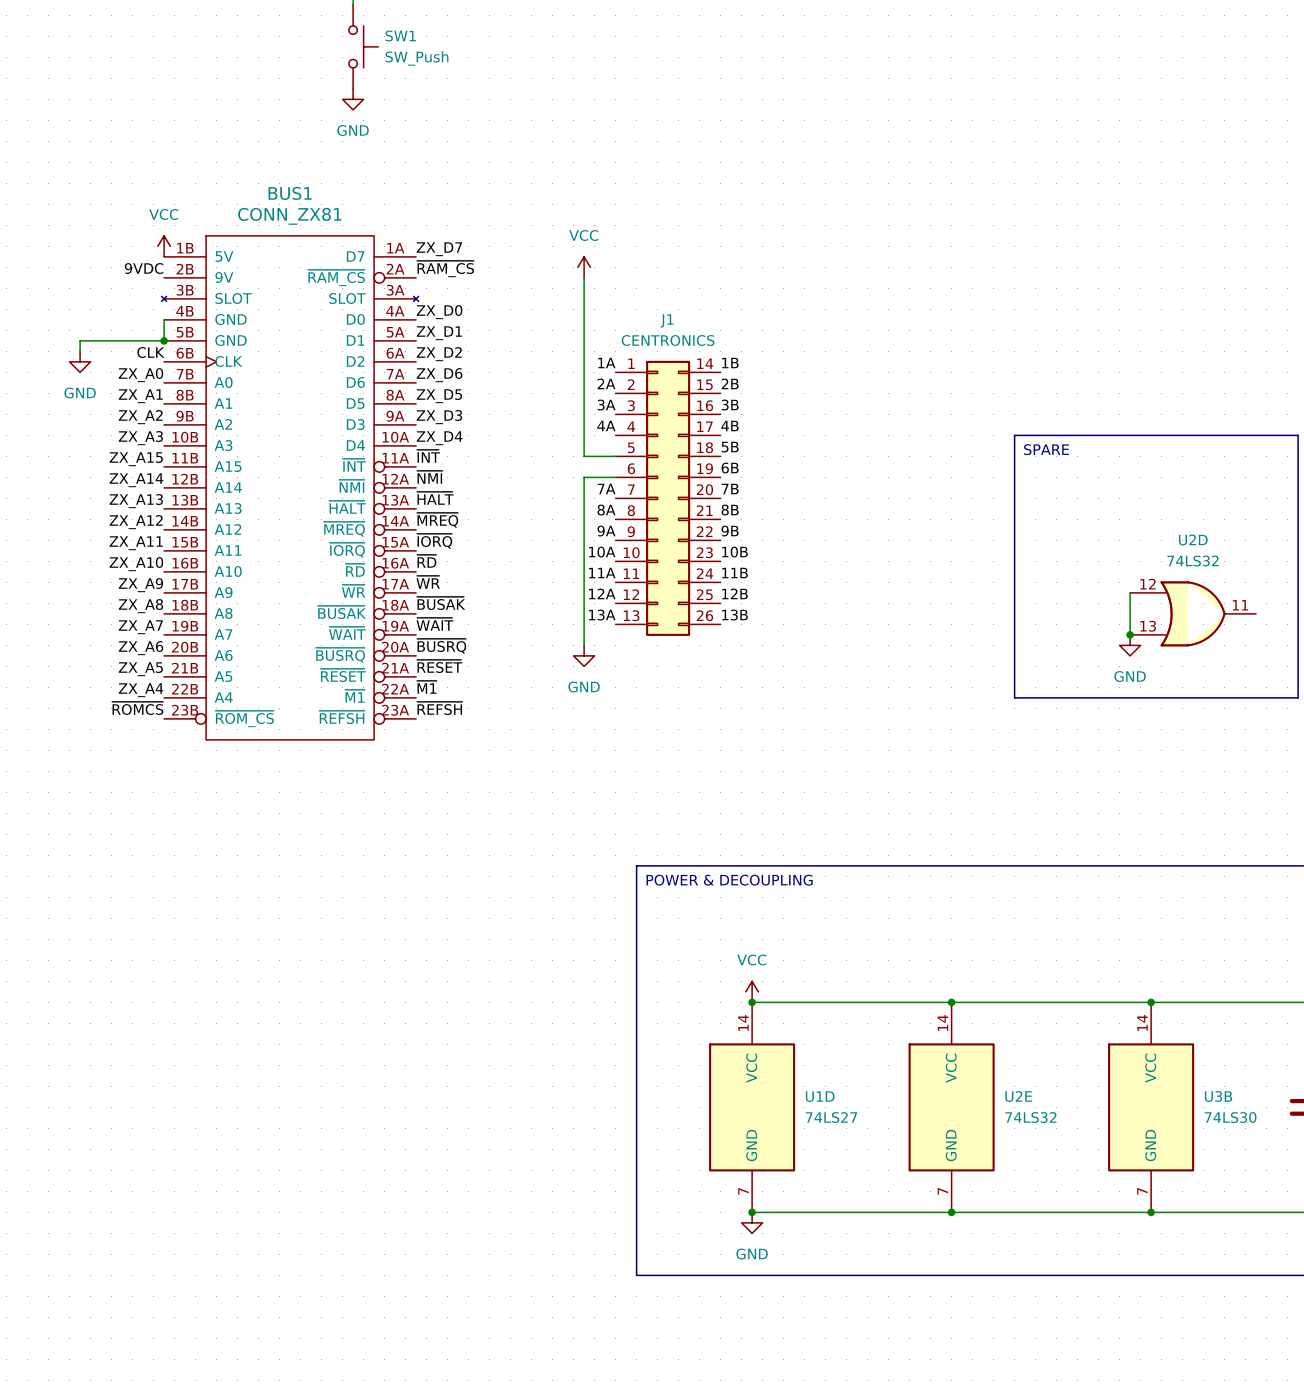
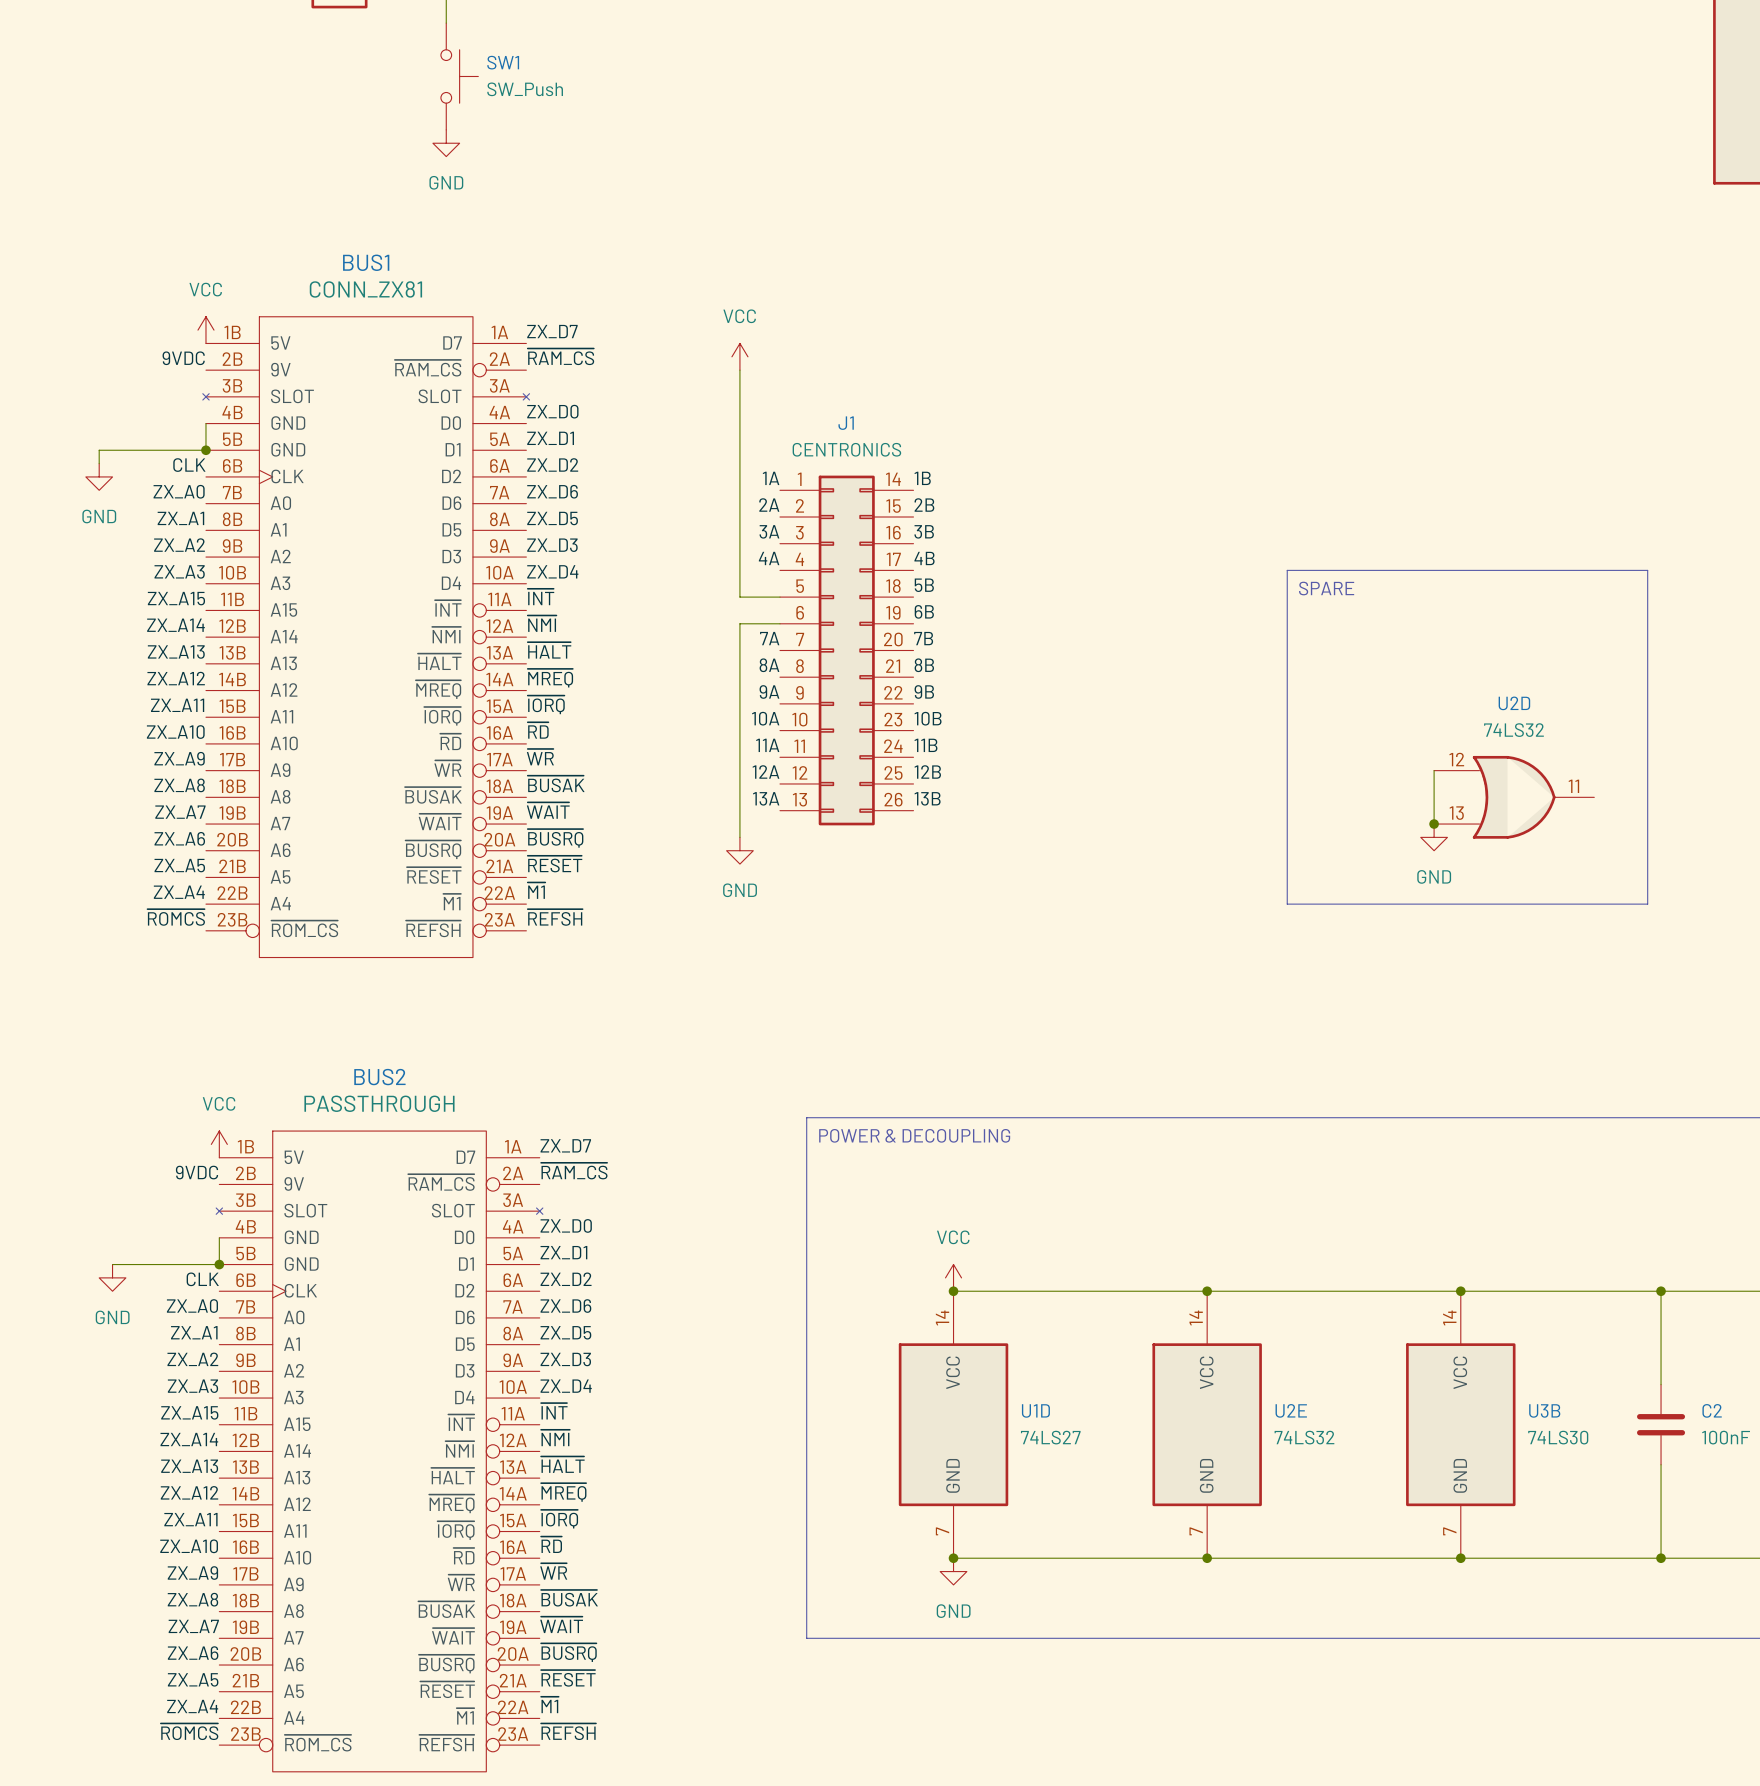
power symbol: none -> VCC (219, 1144)
label: none -> ZX_D7 (565, 1145)
label: none -> 9VDC (196, 1172)
label: none -> ~{RAM_CS} (574, 1171)
label: none -> ZX_D0 (566, 1225)
wire: none -> (219, 1237) (219, 1264) (112, 1264)
label: none -> ZX_D1 (563, 1252)
junction: none -> (219, 1264)
power symbol: none -> GND (112, 1277)
label: none -> CLK (202, 1279)
label: none -> ZX_D2 (566, 1279)
label: none -> ZX_A0 (192, 1306)
label: none -> ZX_D6 (565, 1306)
label: none -> ZX_A1 (194, 1332)
label: none -> ZX_D5 (565, 1332)
label: none -> ZX_A2 (192, 1359)
label: none -> ZX_D3 (565, 1359)
label: none -> ZX_A3 (192, 1386)
label: none -> ZX_D4 (566, 1386)
label: none -> ~{INT} (554, 1411)
label: none -> ZX_A15 (189, 1412)
label: none -> ~{NMI} (555, 1437)
label: none -> ZX_A14 (189, 1439)
BUS2: none -> PASSTHROUGH (379, 1451)
label: none -> ~{HALT} (562, 1464)
label: none -> ZX_A13 (189, 1466)
label: none -> ~{MREQ} (563, 1492)
label: none -> ZX_A12 (189, 1492)
label: none -> ~{IORQ} (559, 1519)
label: none -> ZX_A11 (190, 1519)
label: none -> ~{RD} (551, 1544)
label: none -> ZX_A10 (189, 1546)
label: none -> ~{WR} (553, 1571)
label: none -> ZX_A9 (192, 1573)
label: none -> ~{BUSAK} (569, 1598)
label: none -> ZX_A8 (192, 1599)
label: none -> ~{WAIT} (561, 1624)
label: none -> ZX_A7 (193, 1626)
label: none -> ~{BUSRQ} (568, 1652)
label: none -> ZX_A6 (193, 1653)
label: none -> ~{RESET} (568, 1678)
label: none -> ZX_A5 (193, 1679)
label: none -> ~{M1} (549, 1704)
label: none -> ZX_A4 (192, 1706)
label: none -> ~{ROMCS} (189, 1731)
label: none -> ~{REFSH} (568, 1731)

